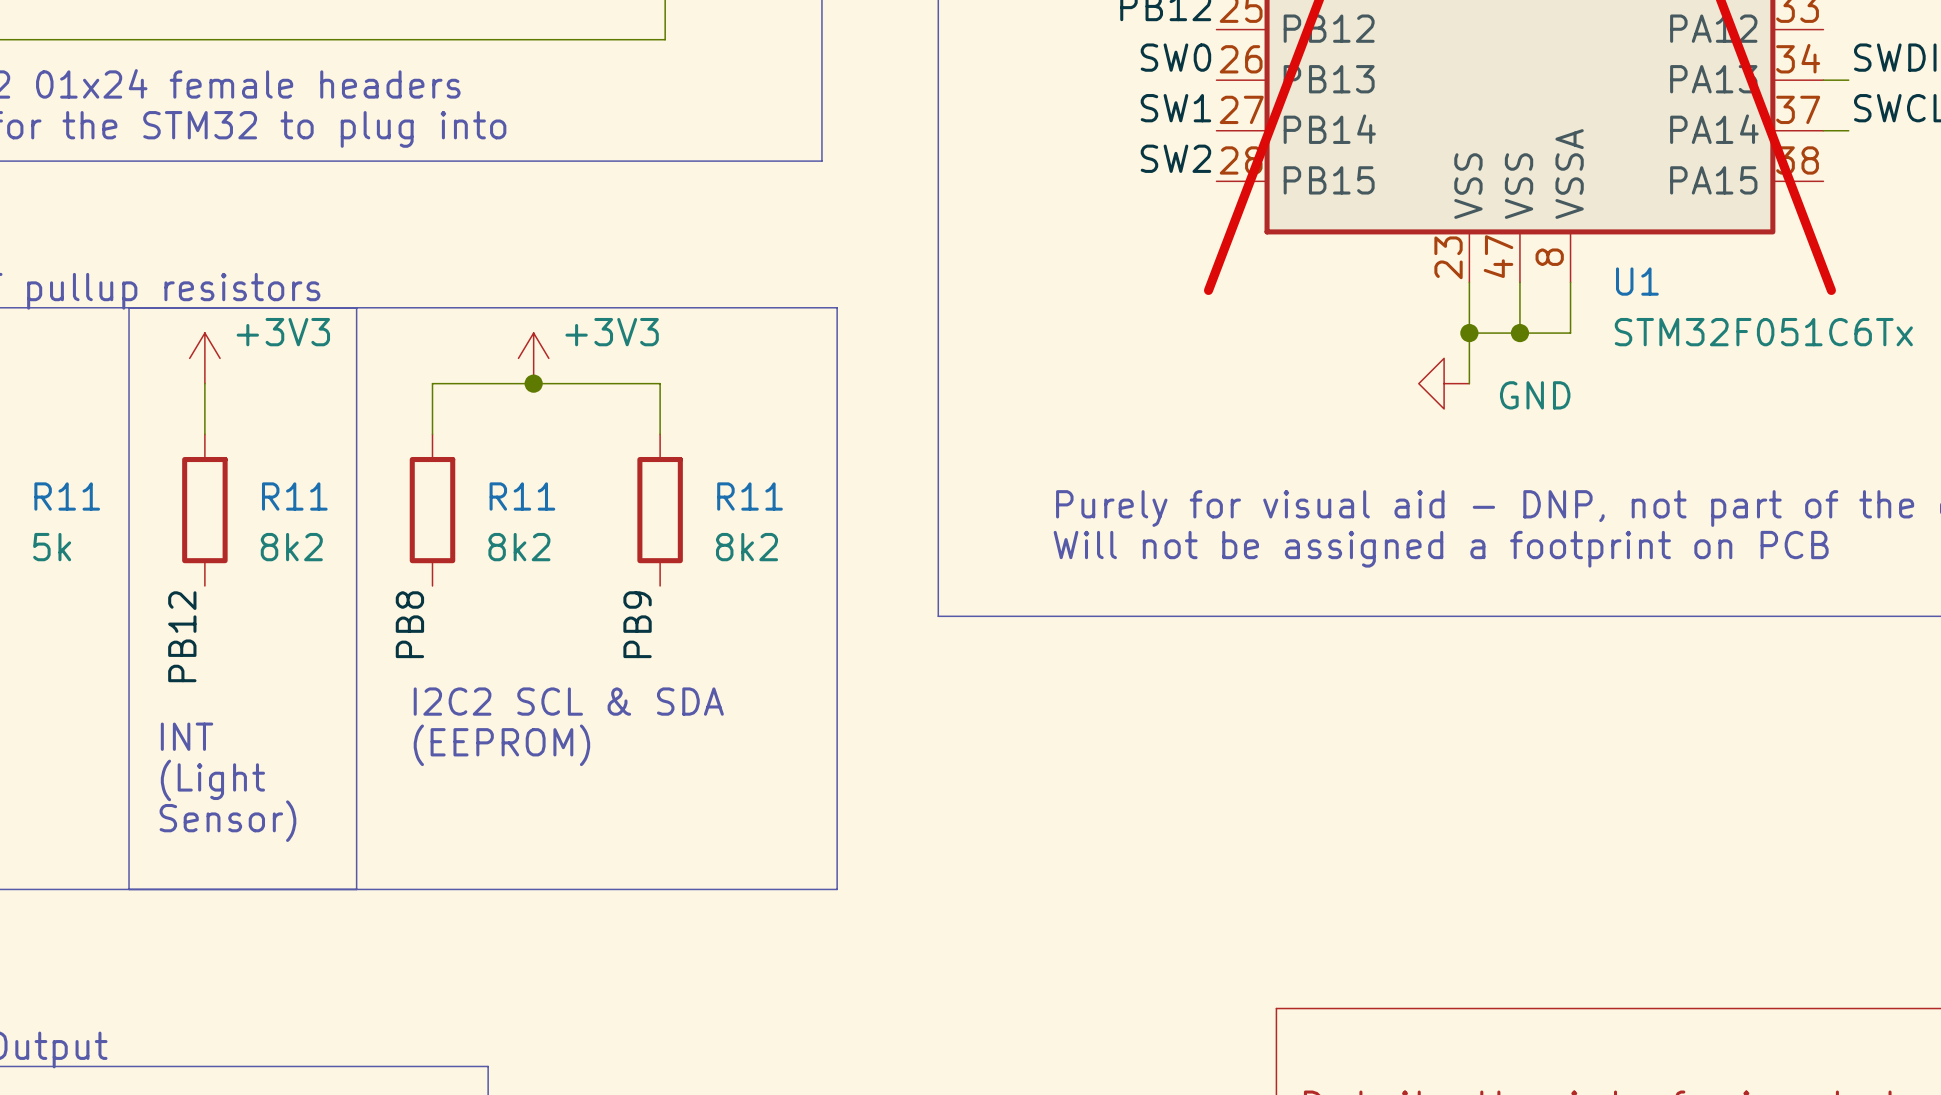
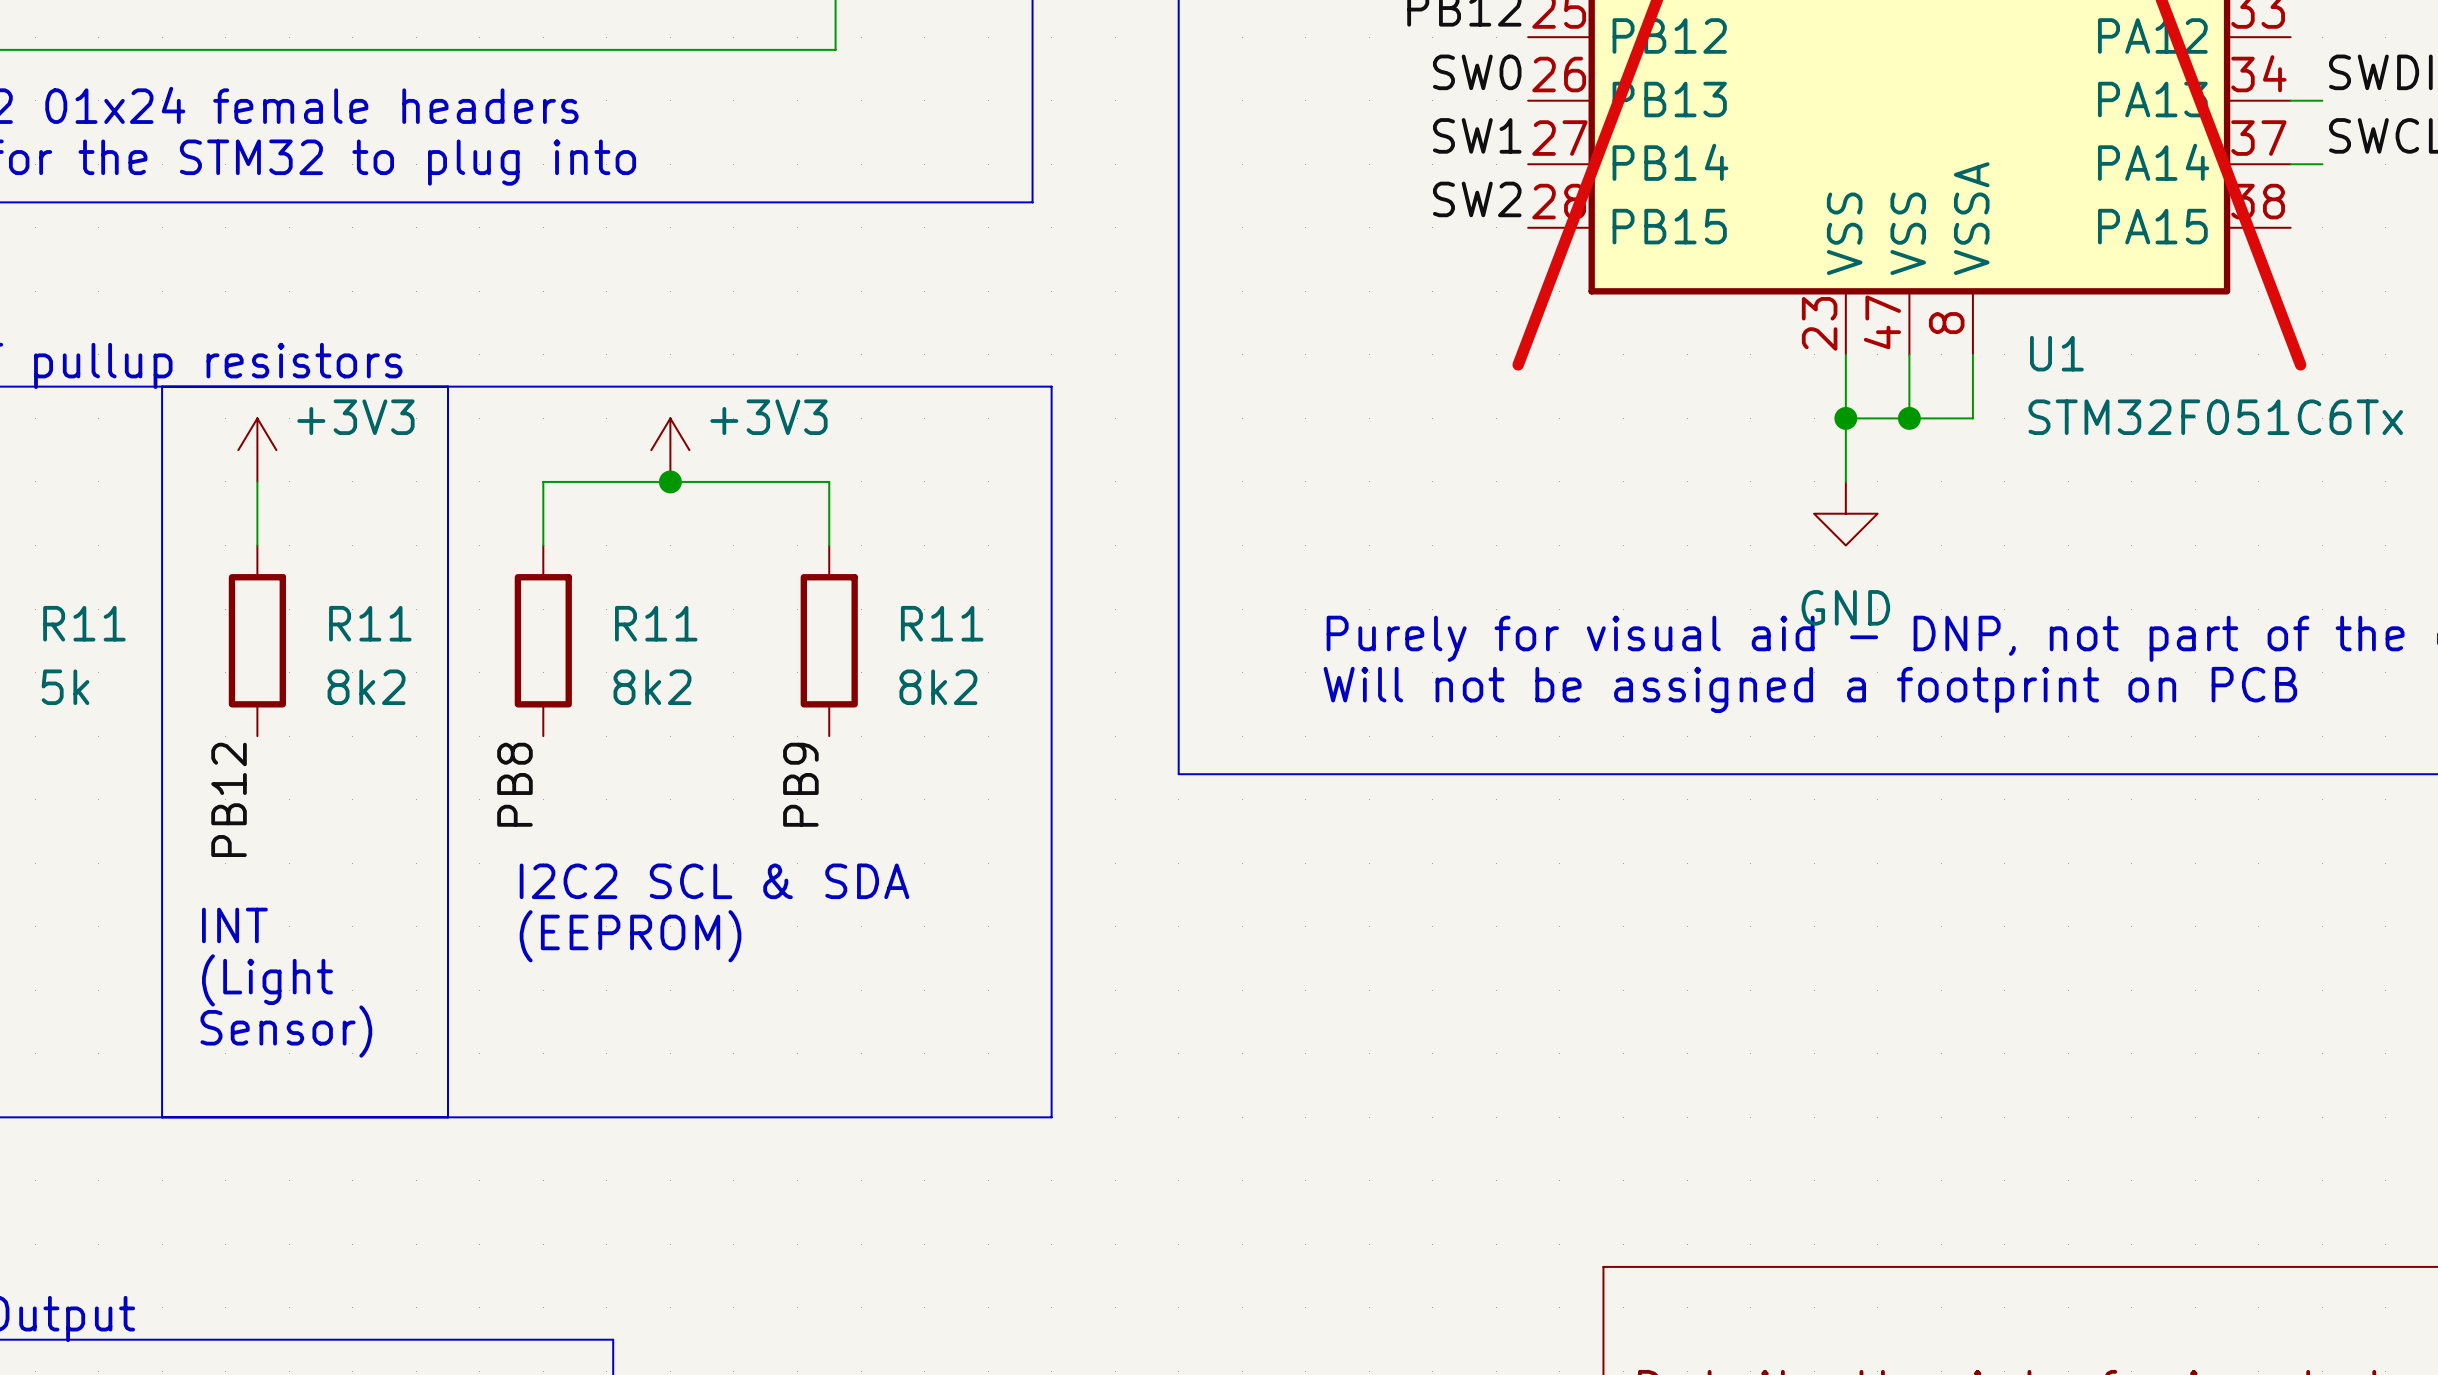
power symbol rotation: 0° (1444, 383) -> 90° counterclockwise (1845, 513)
power symbol position: GND (1444, 383) -> GND (1845, 513)
power symbol text position: GND (1535, 395) -> GND (1845, 607)

